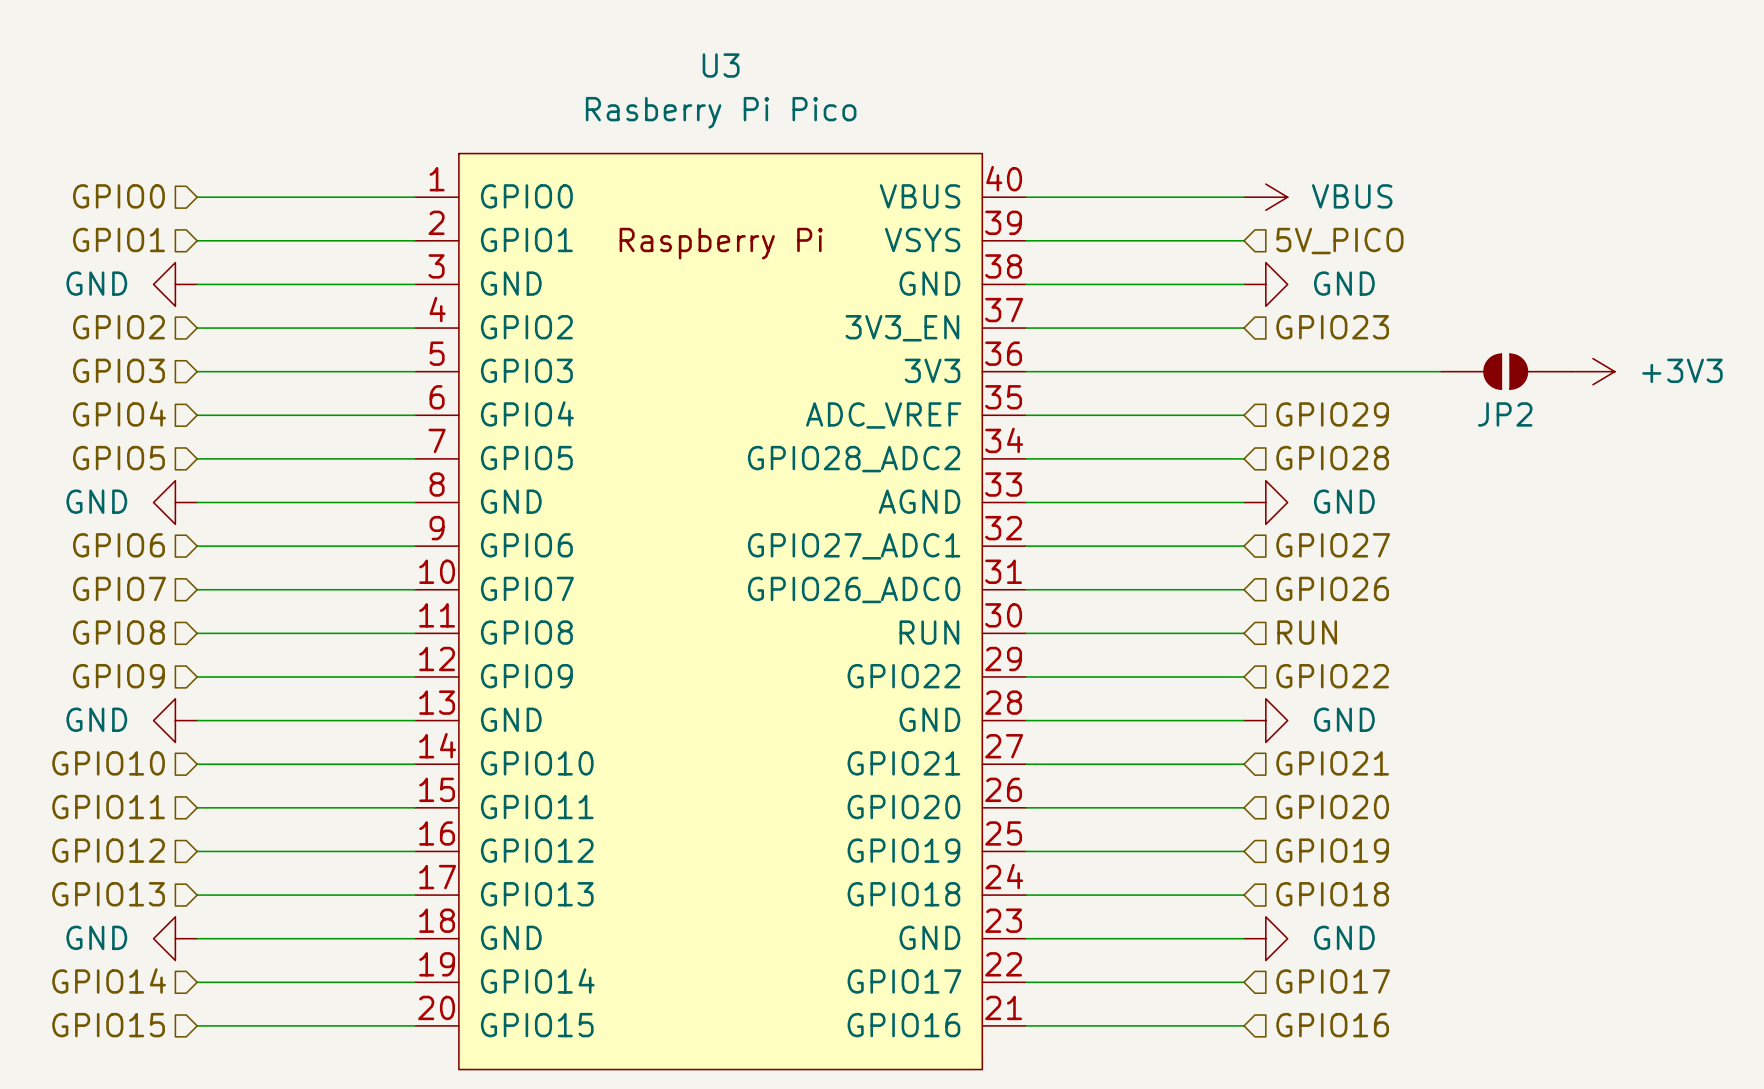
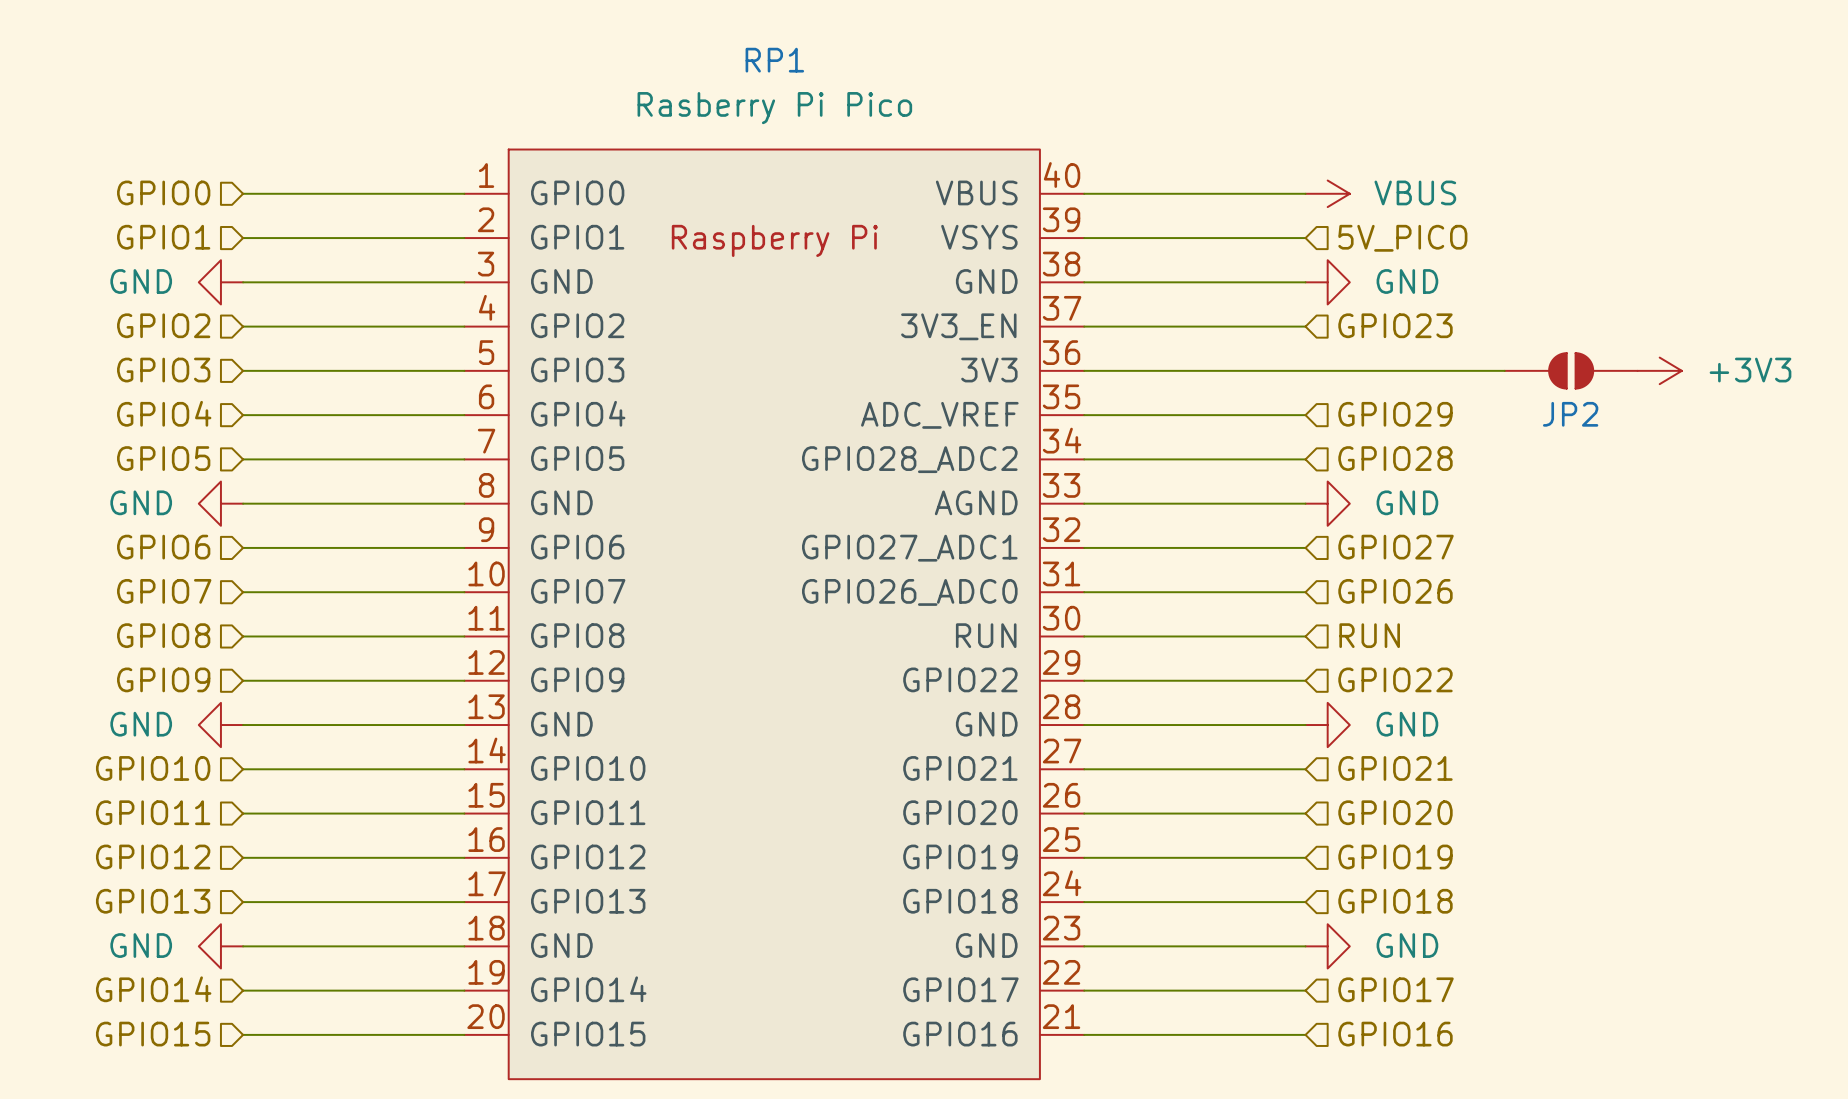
U3 name: U3 (721, 65) -> RP1 (774, 60)

